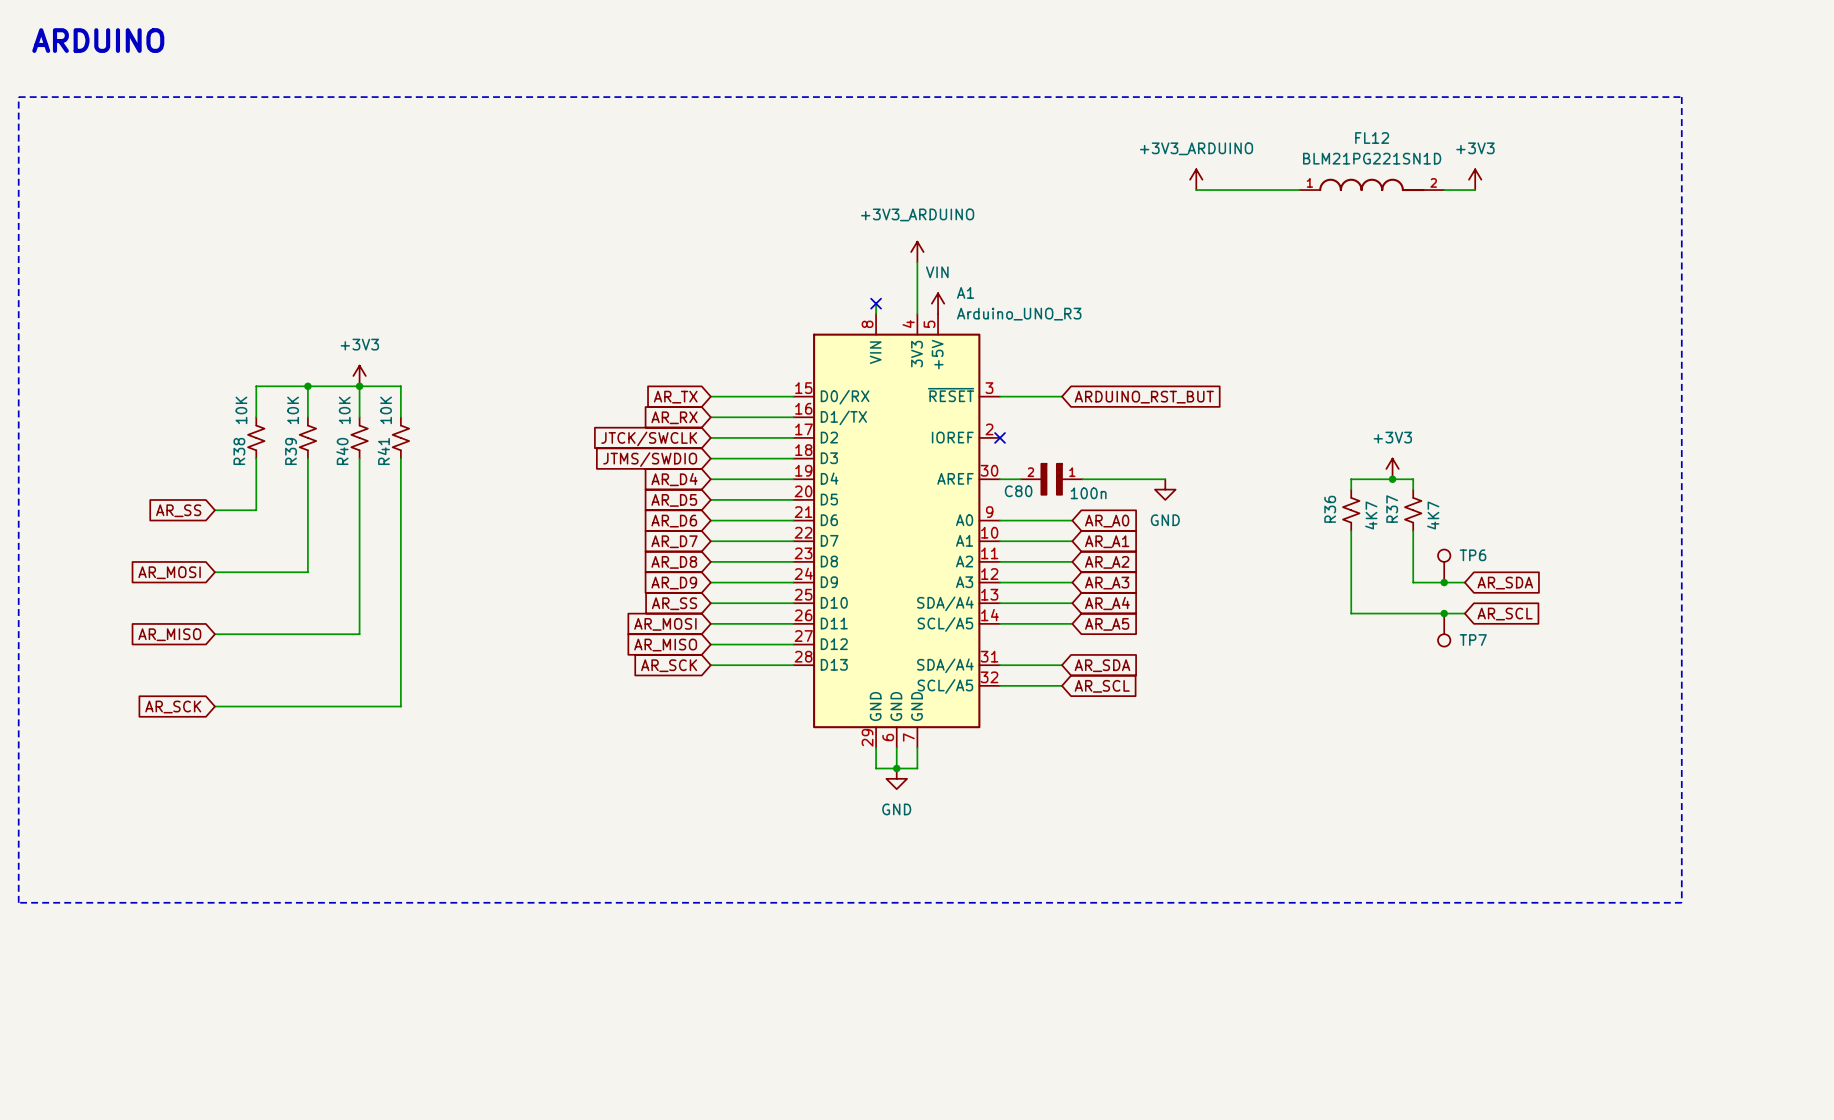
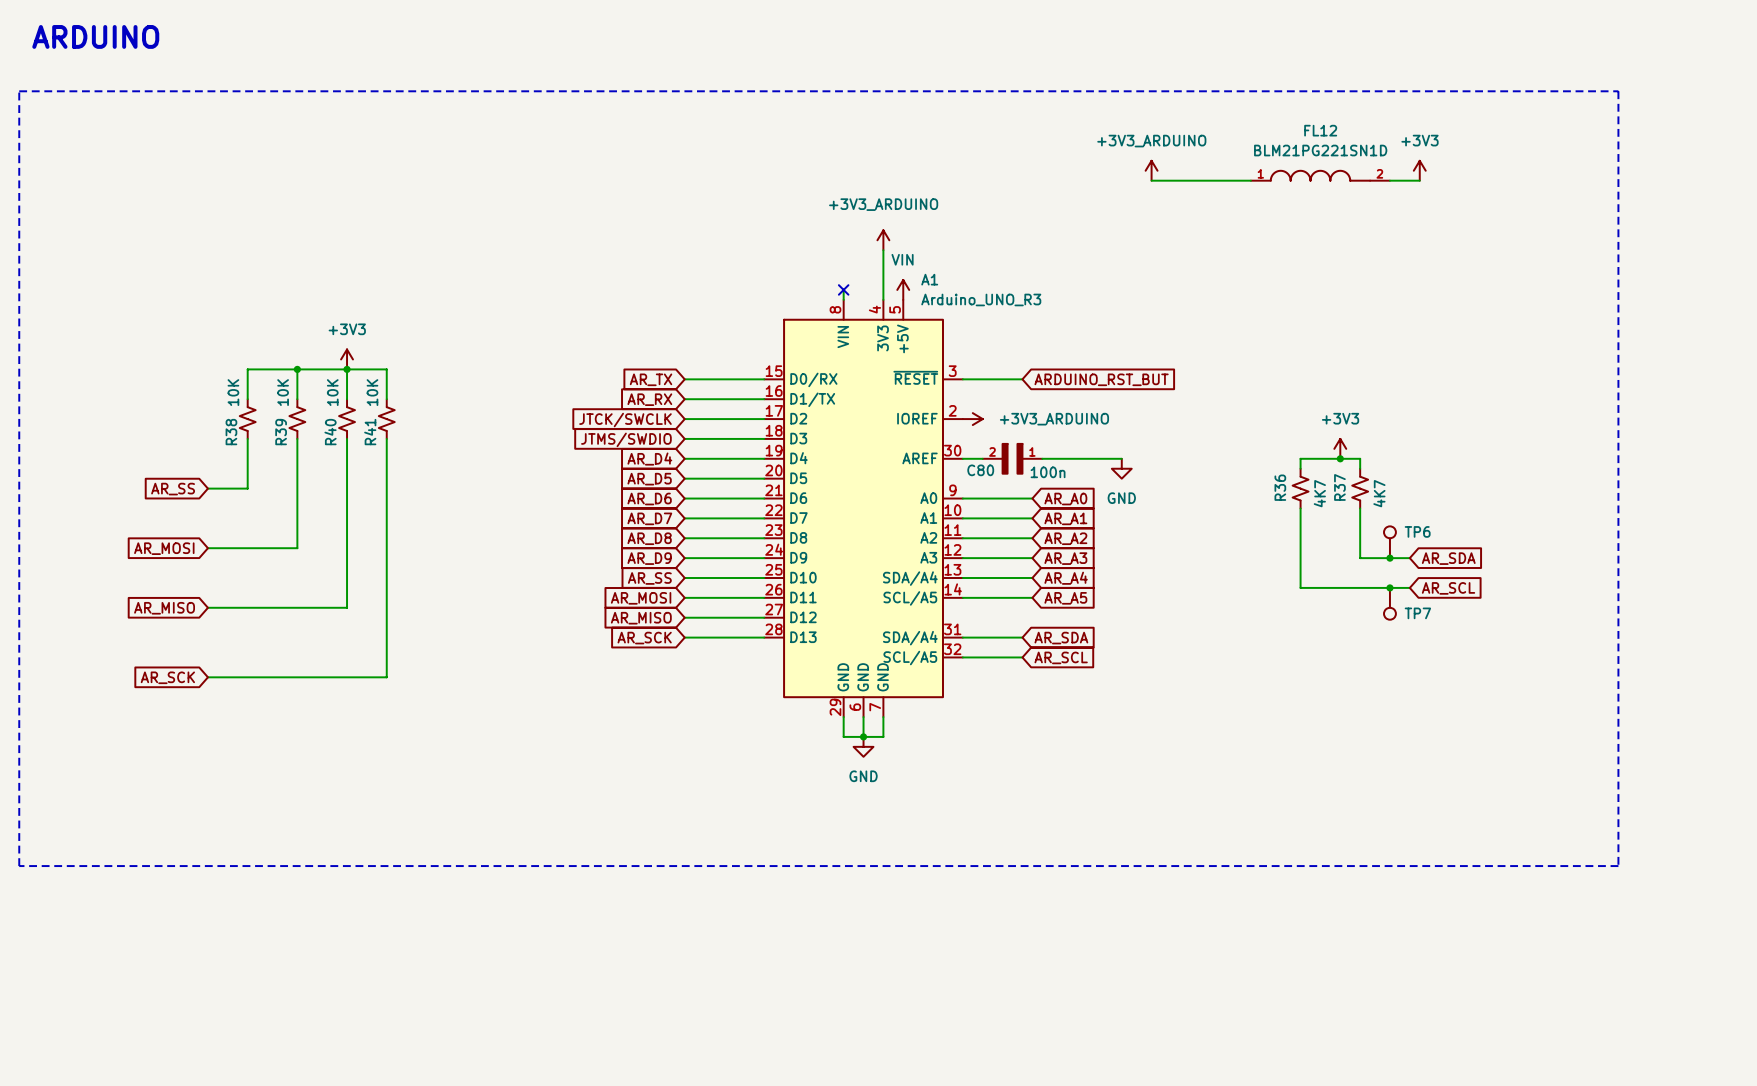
no-connect mark: (1000, 437) -> none
power symbol: none -> +3V3_ARDUINO (972, 419)

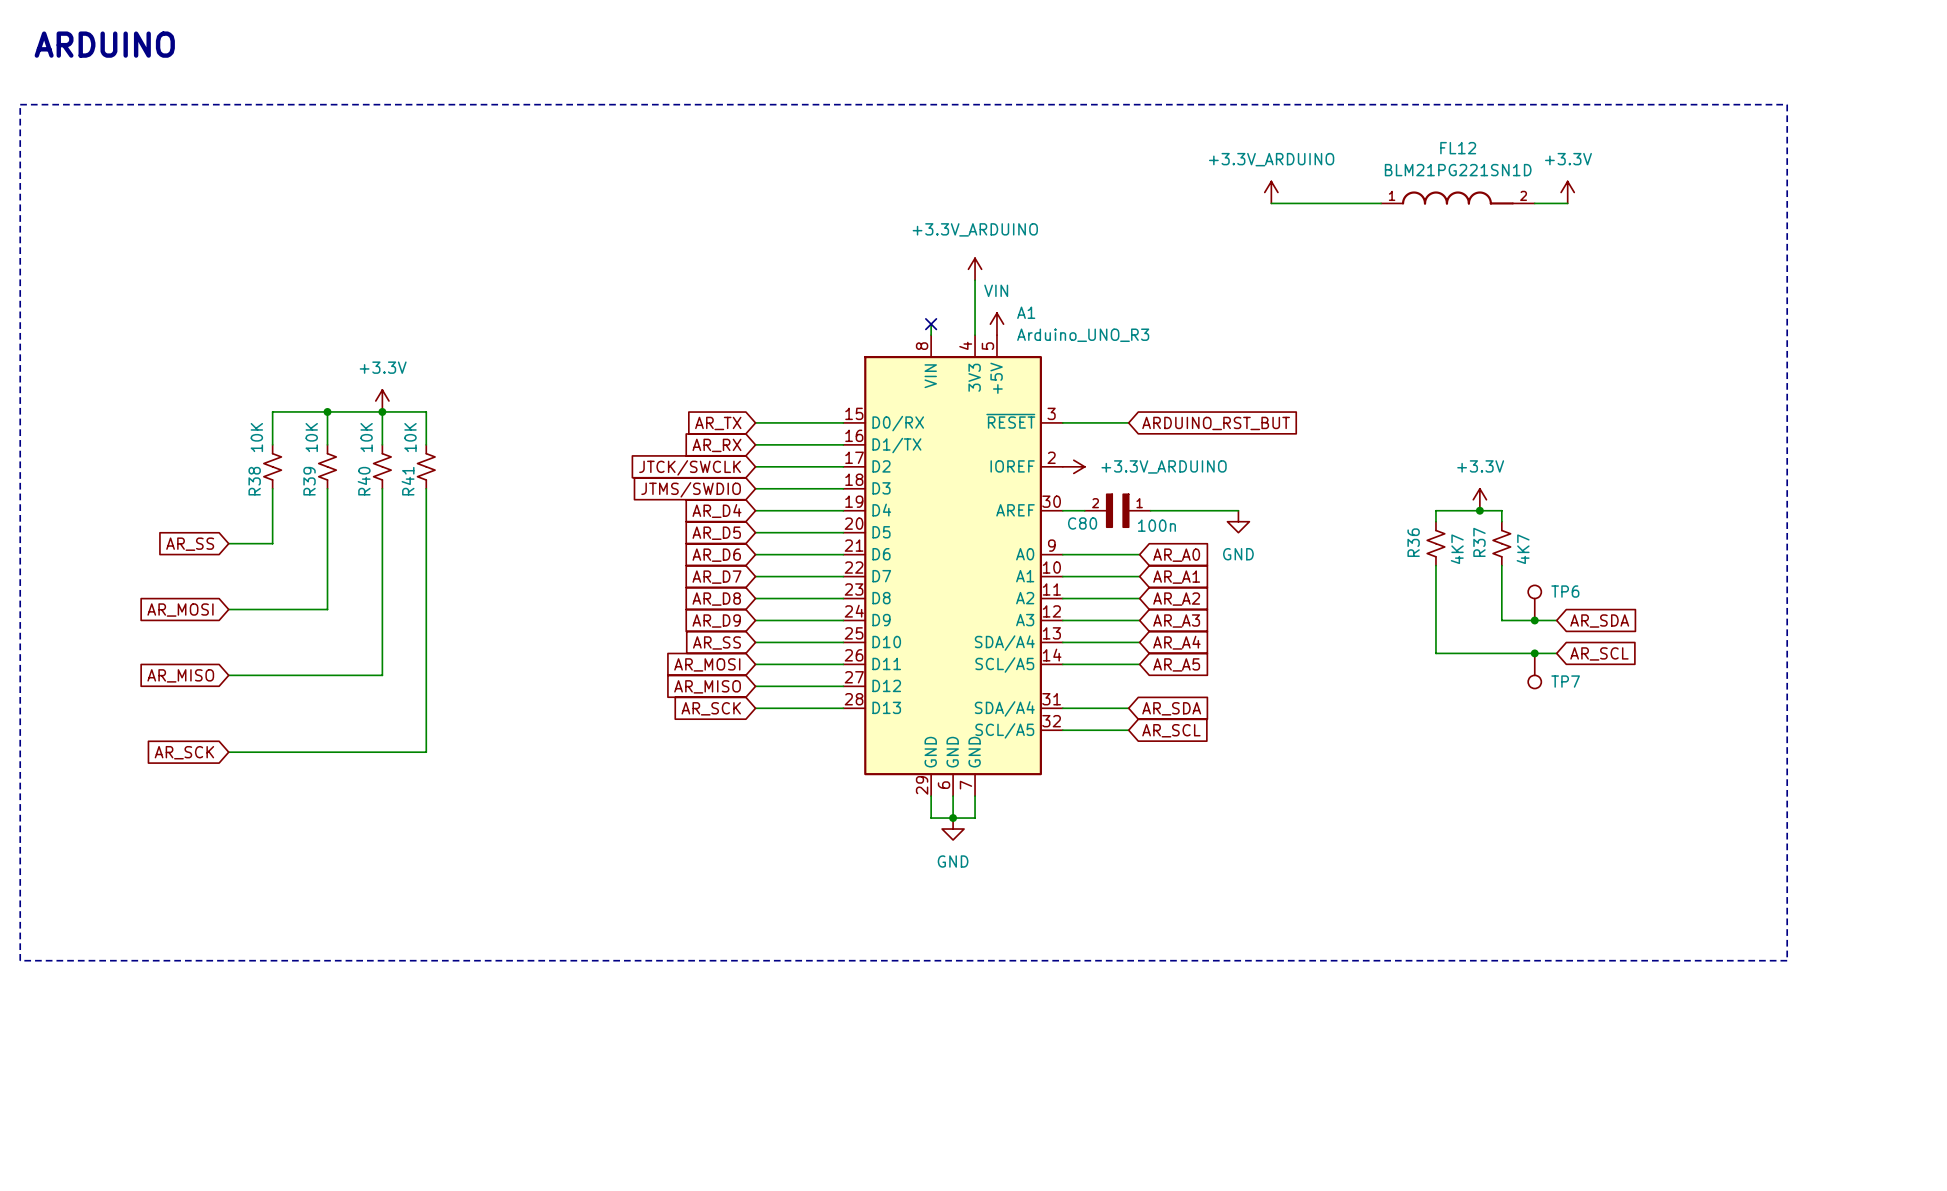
power symbol: +3V3_ARDUINO (1151, 170) -> +3.3V_ARDUINO (1271, 192)
power symbol: +3V3 (1419, 170) -> +3.3V (1567, 192)
power symbol: +3V3_ARDUINO (883, 240) -> +3.3V_ARDUINO (975, 269)
power symbol: +3V3 (347, 359) -> +3.3V (382, 400)
power symbol: +3V3_ARDUINO (972, 419) -> +3.3V_ARDUINO (1073, 466)
power symbol: +3V3 (1340, 448) -> +3.3V (1479, 499)

